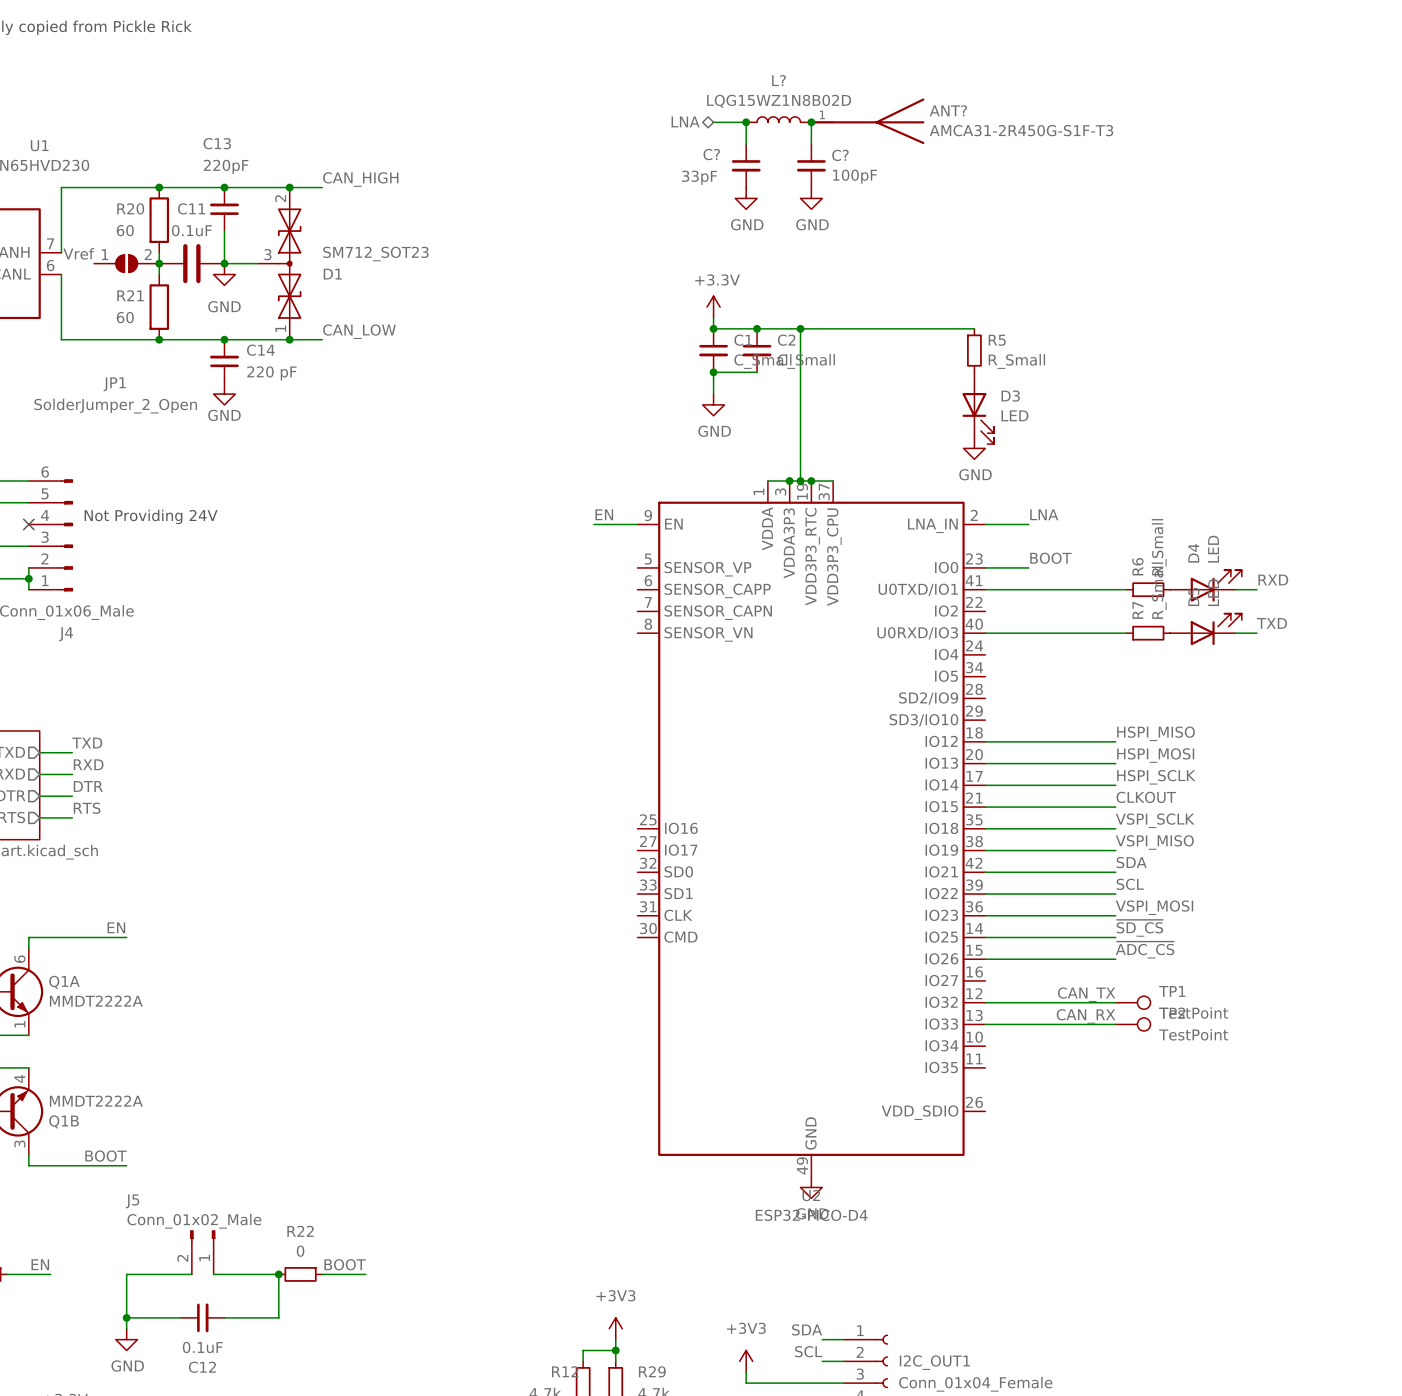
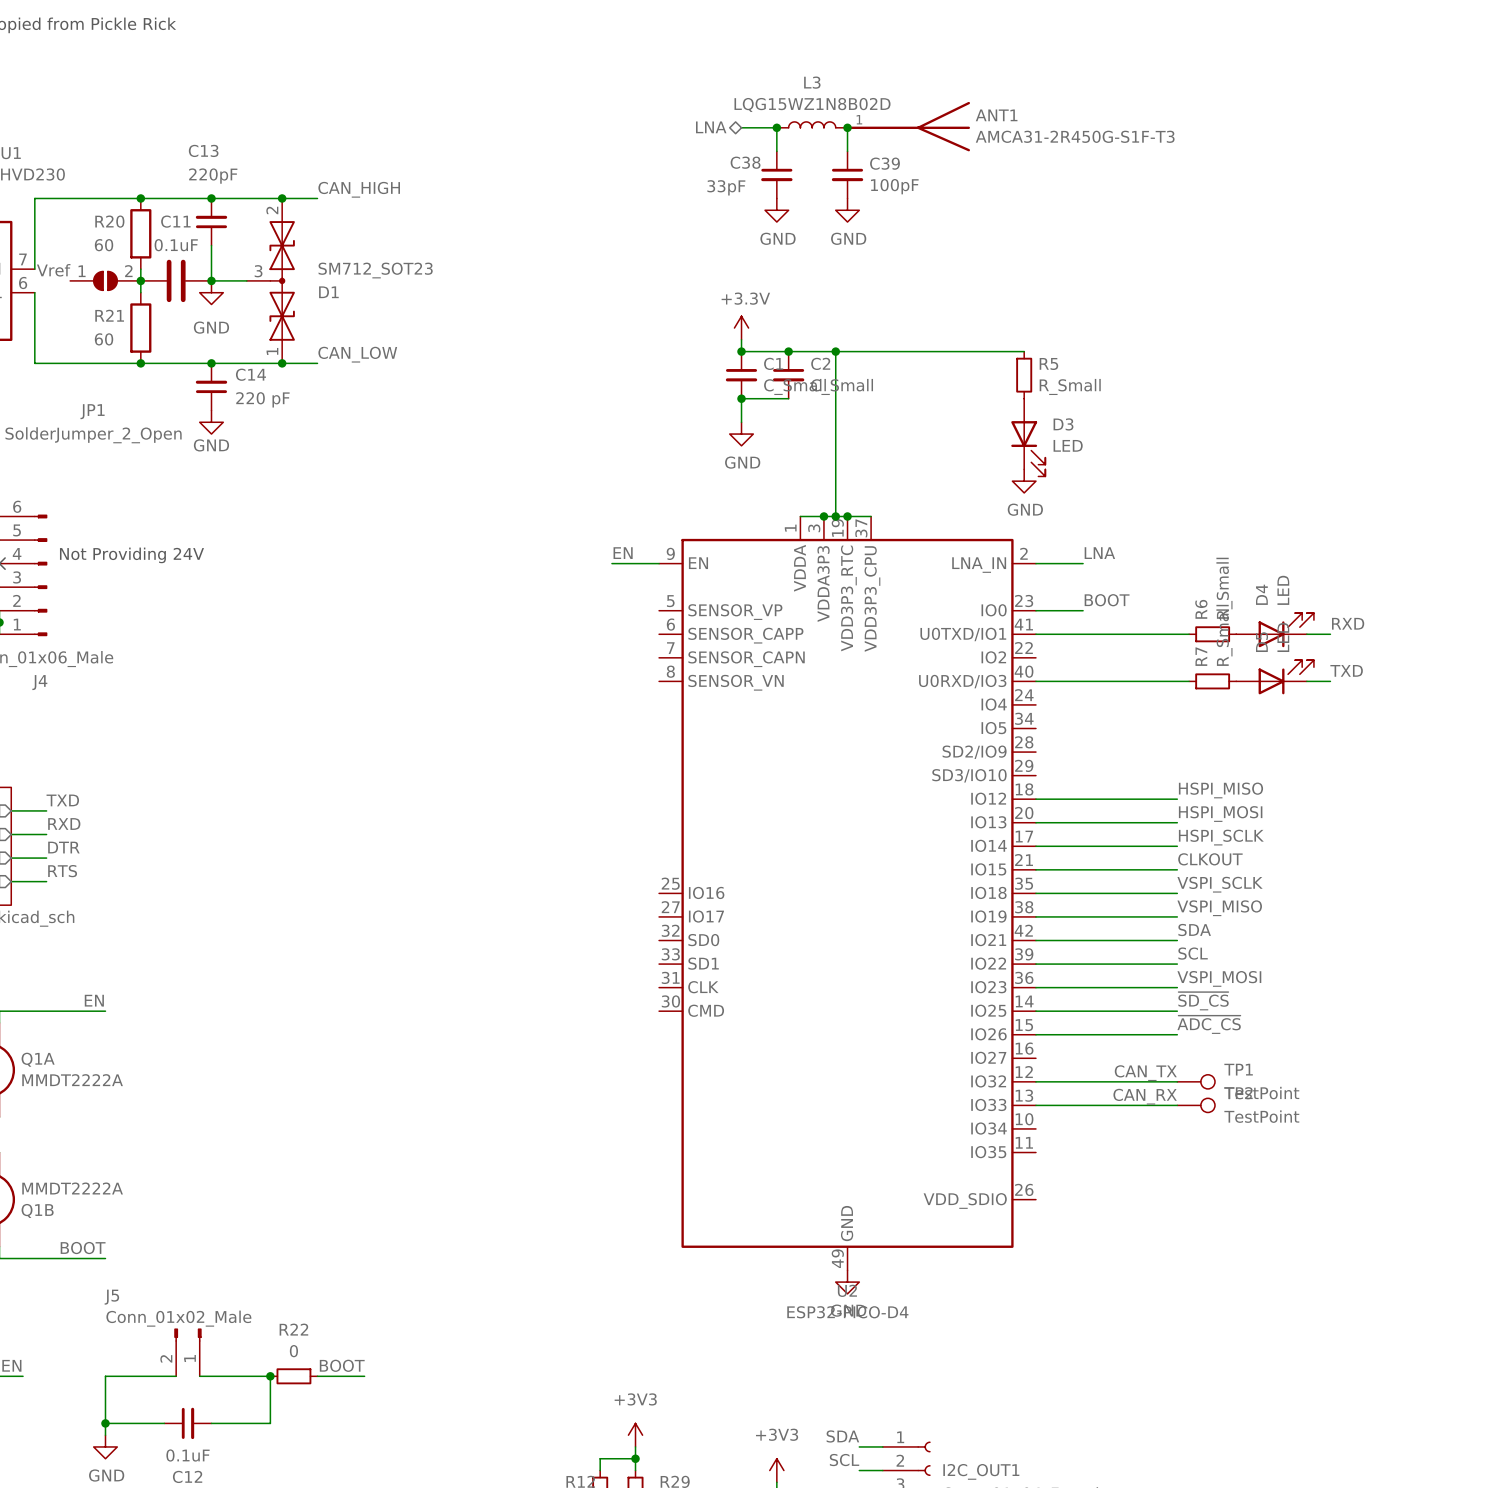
L? name: L? (778, 80) -> L3 (812, 82)
ANT? name: ANT? (948, 110) -> ANT1 (996, 115)
C? name: C? (711, 154) -> C38 (745, 162)
C? name: C? (840, 155) -> C39 (884, 163)

